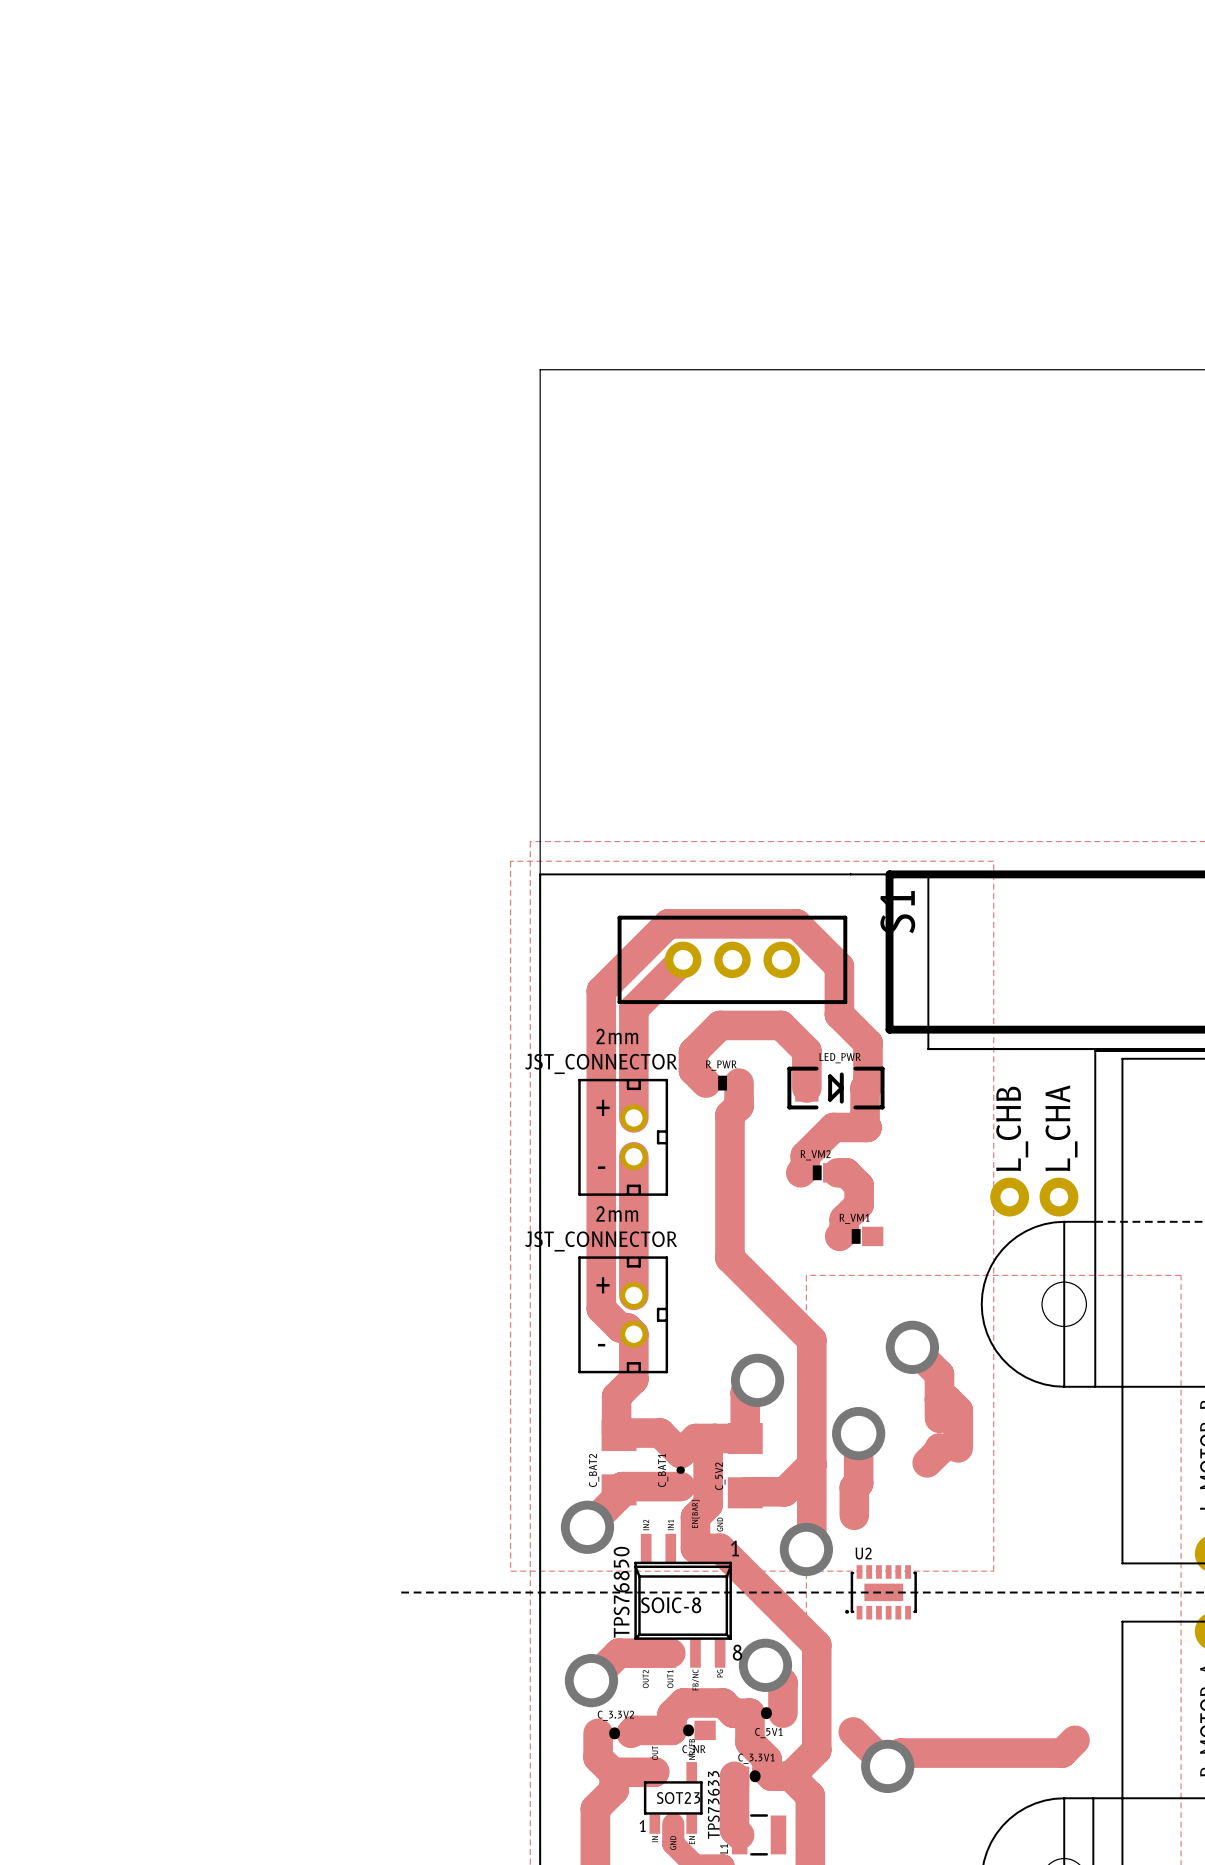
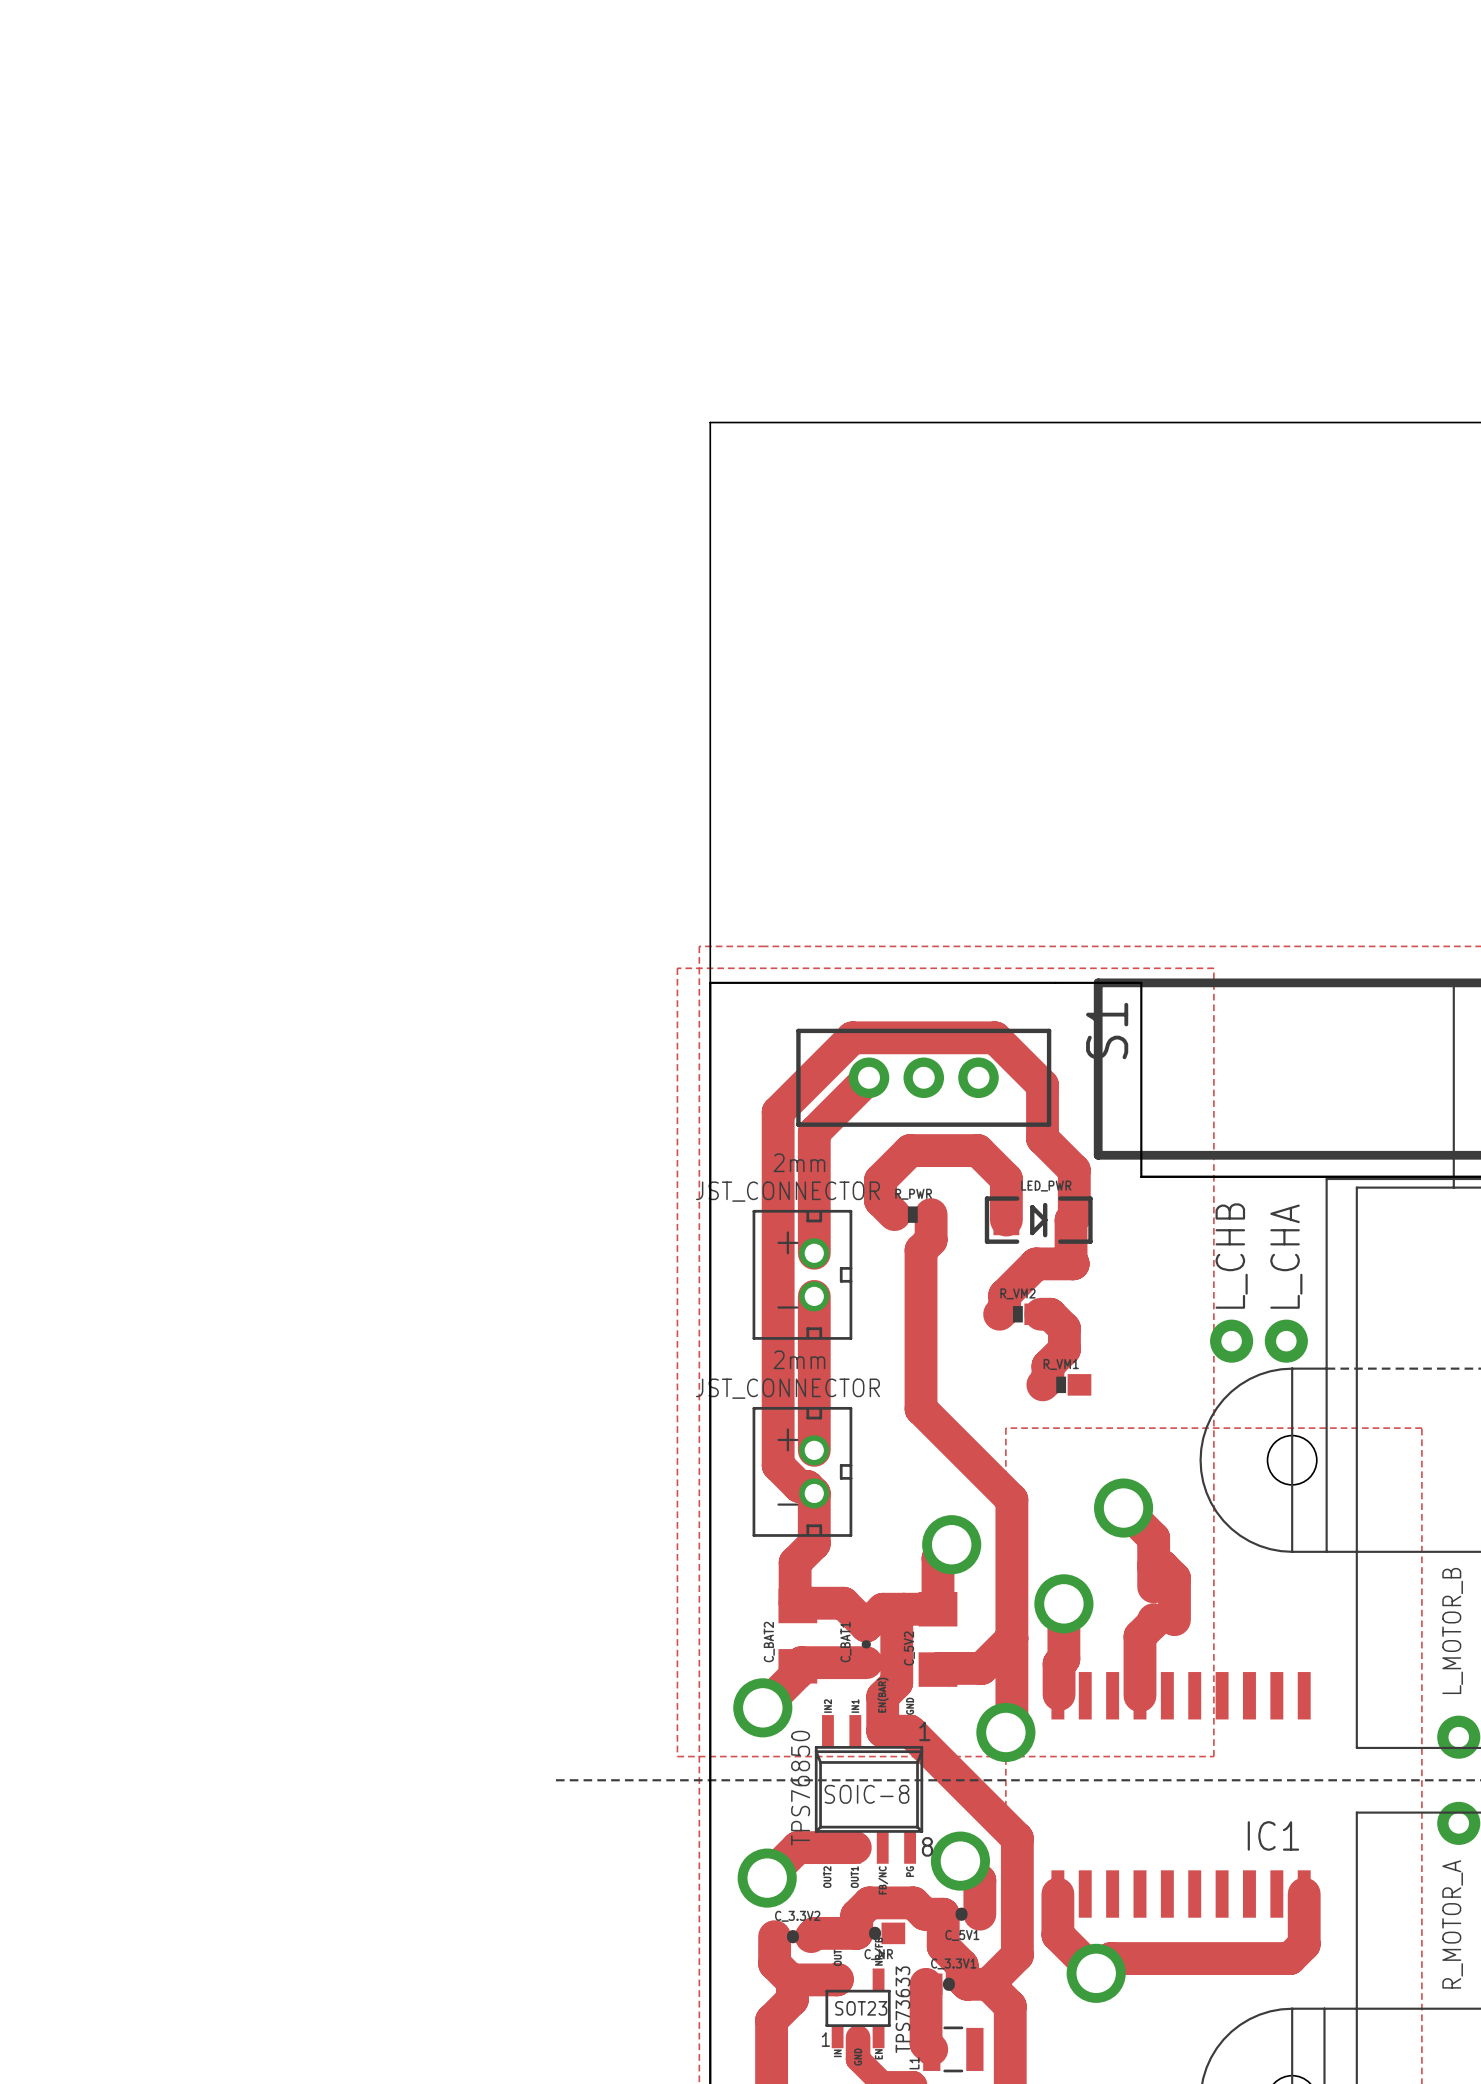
track: none -> (1139, 1636) (1139, 1695)
U2: (881, 1592) -> none
IC1: none -> (1181, 1794)
track: none -> (1057, 1894) (1057, 1935)
track: none -> (1304, 1894) (1304, 1944)

